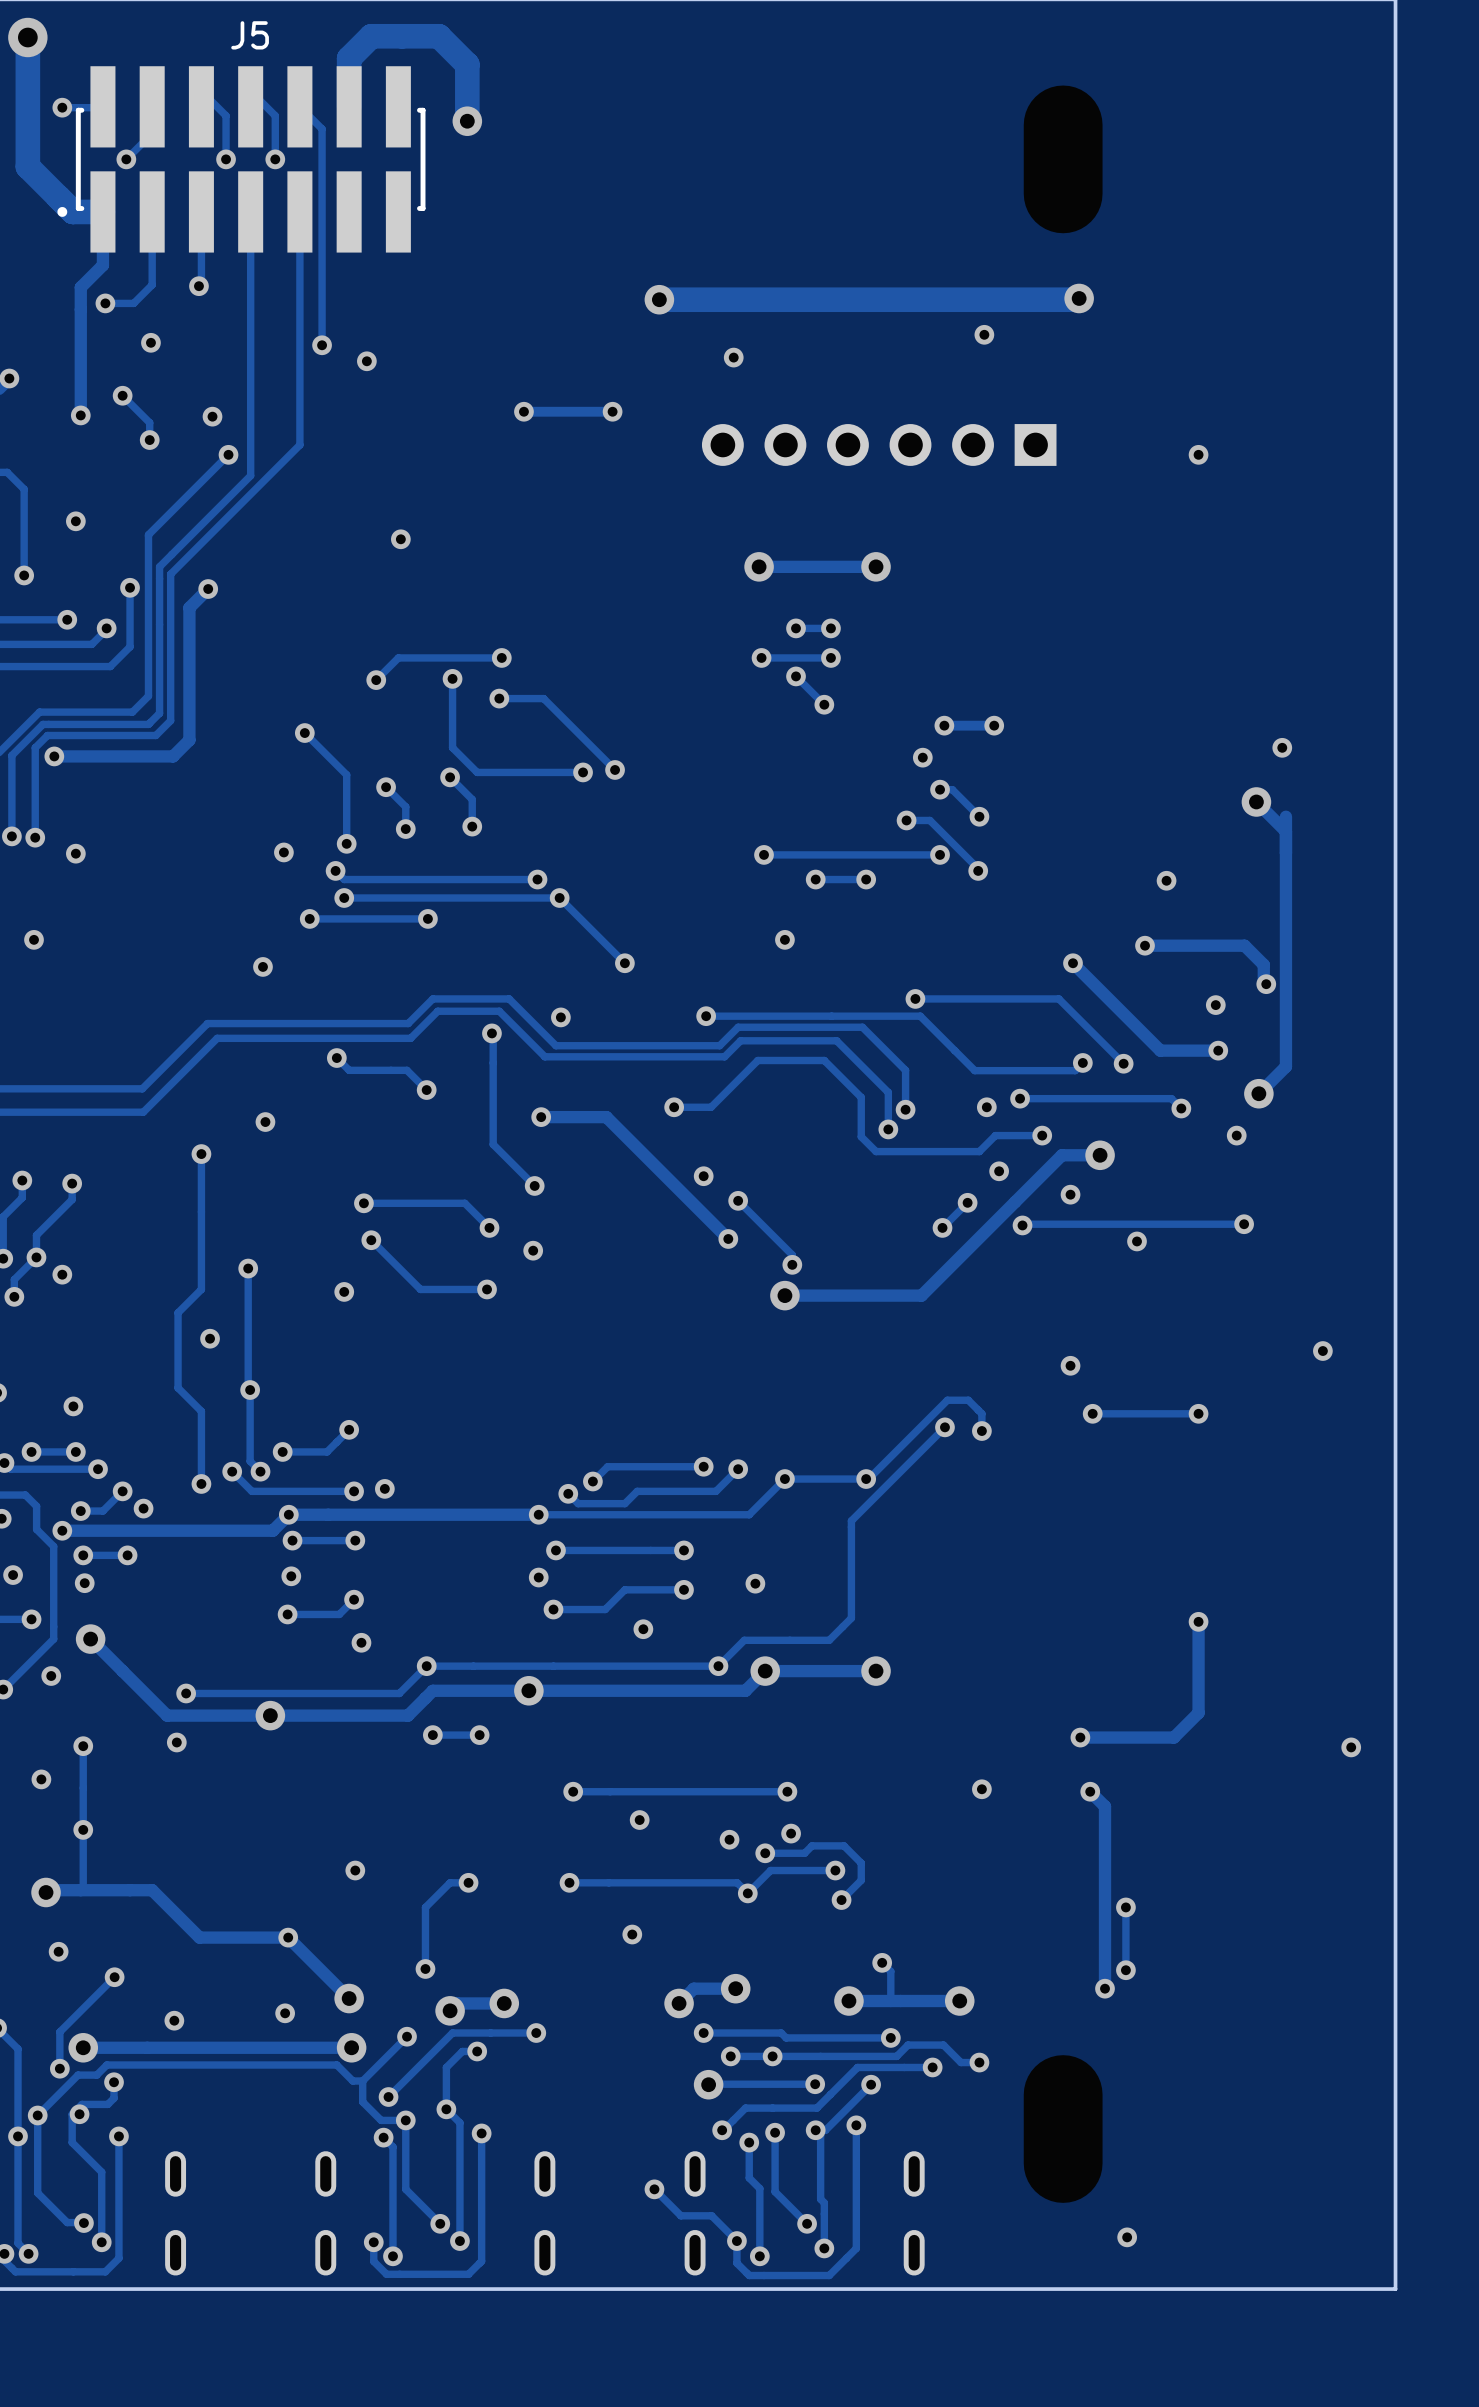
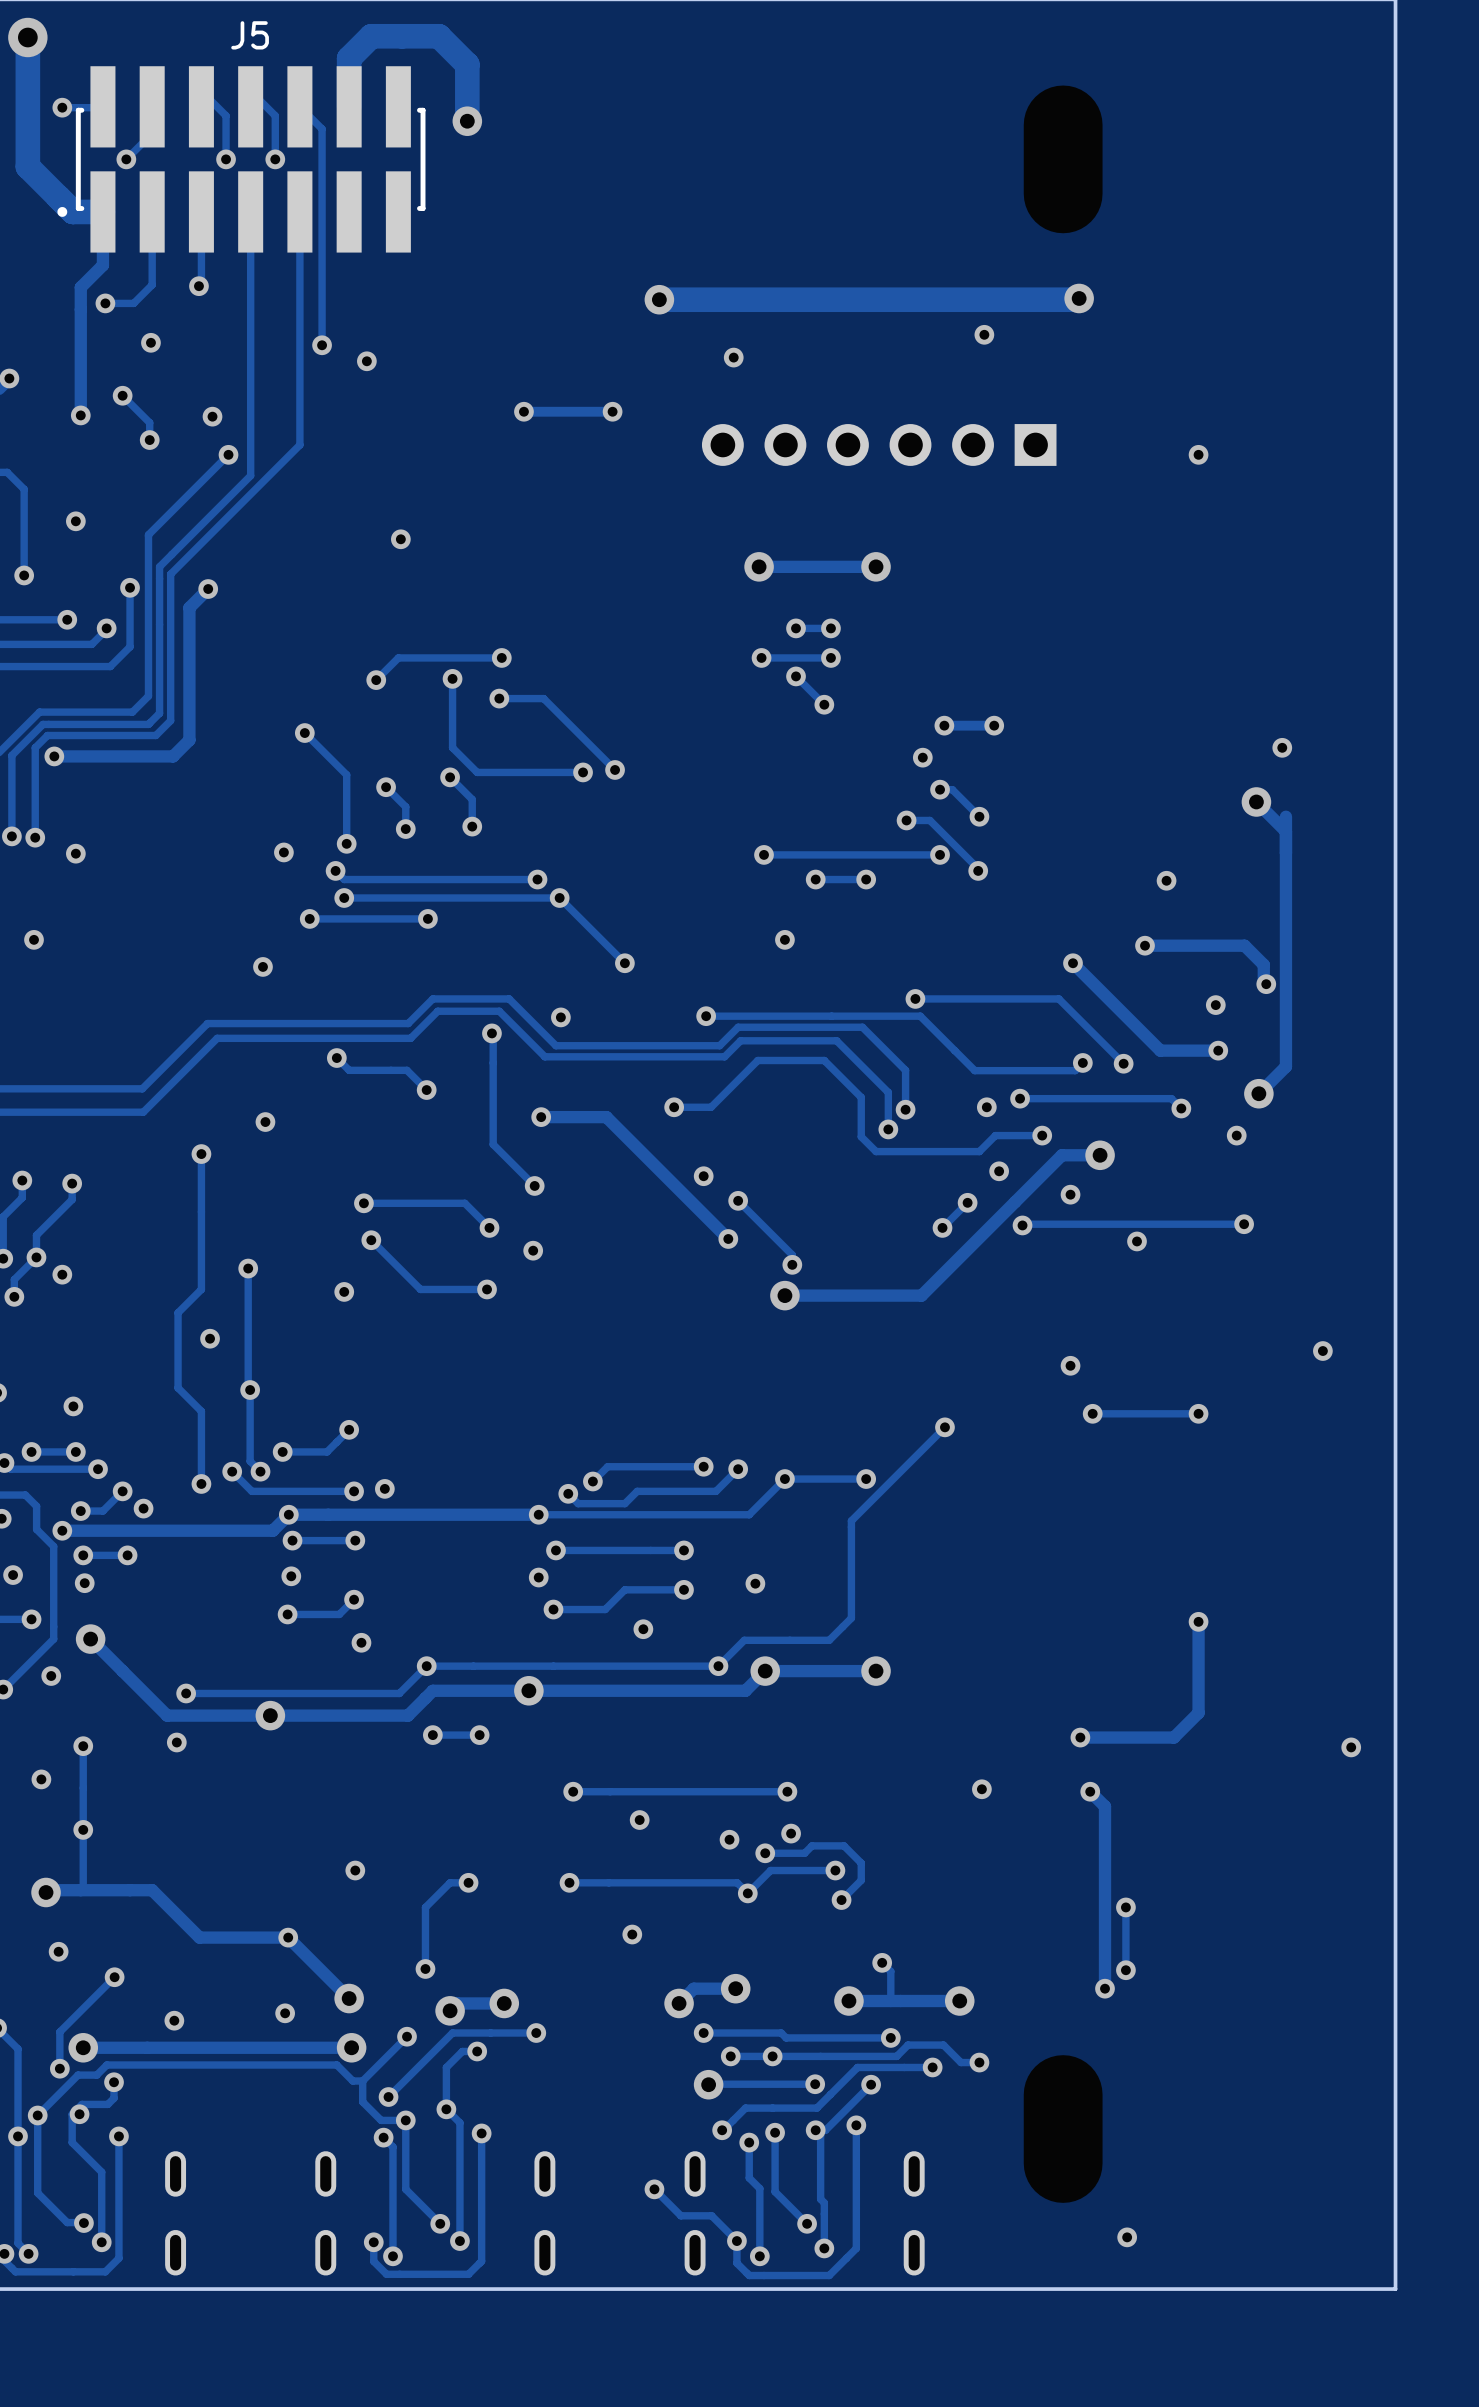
track: (981, 1431) (981, 1413) (968, 1400) (947, 1400) (868, 1479) (866, 1479) -> none
via: (981, 1431) -> none

